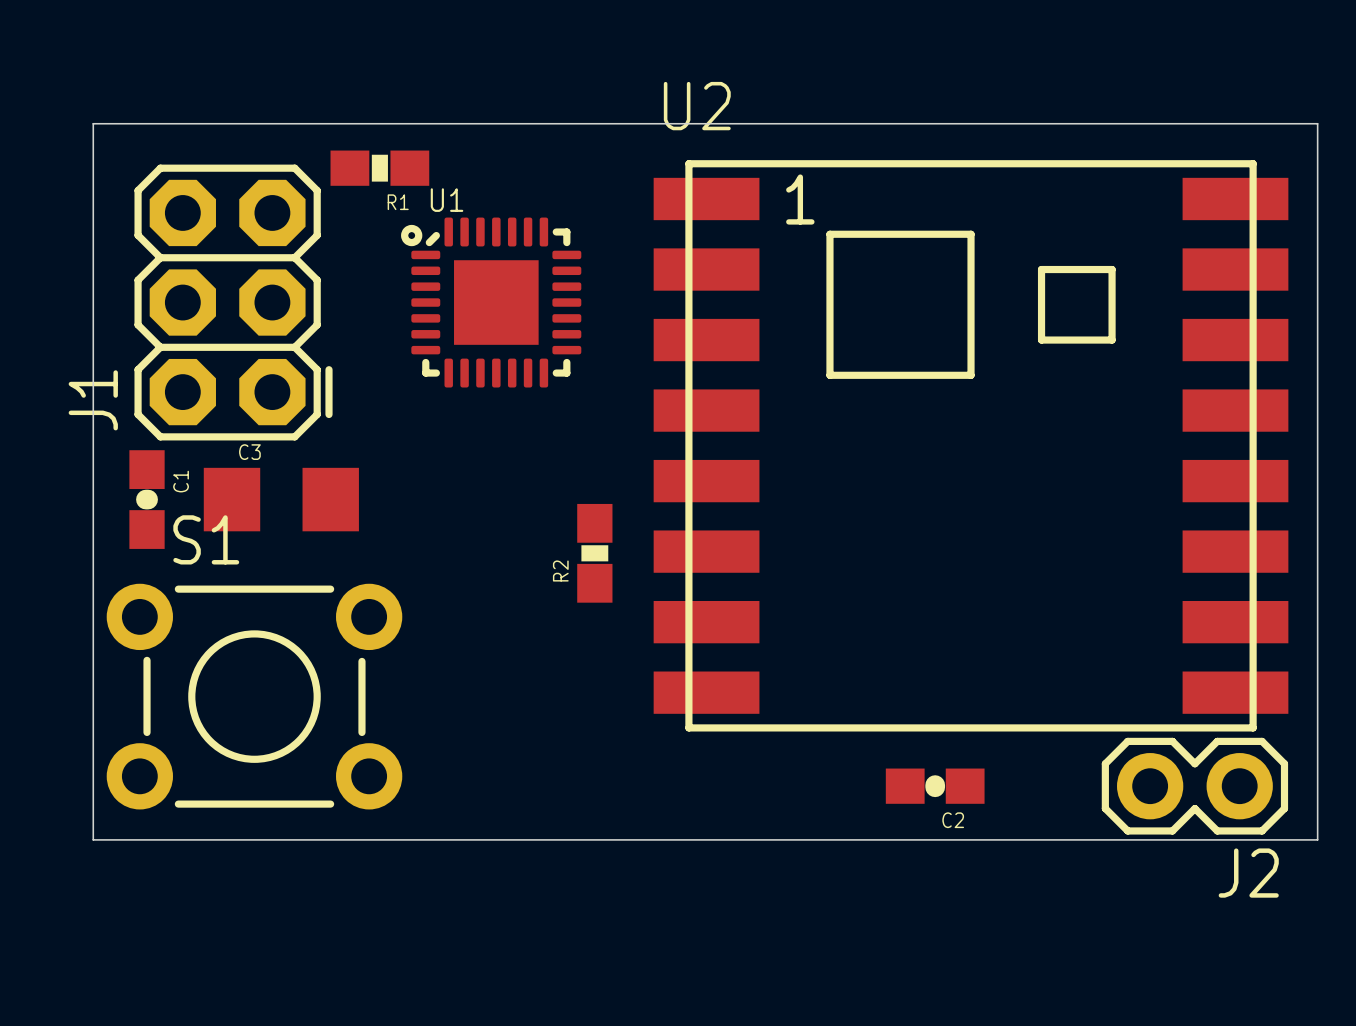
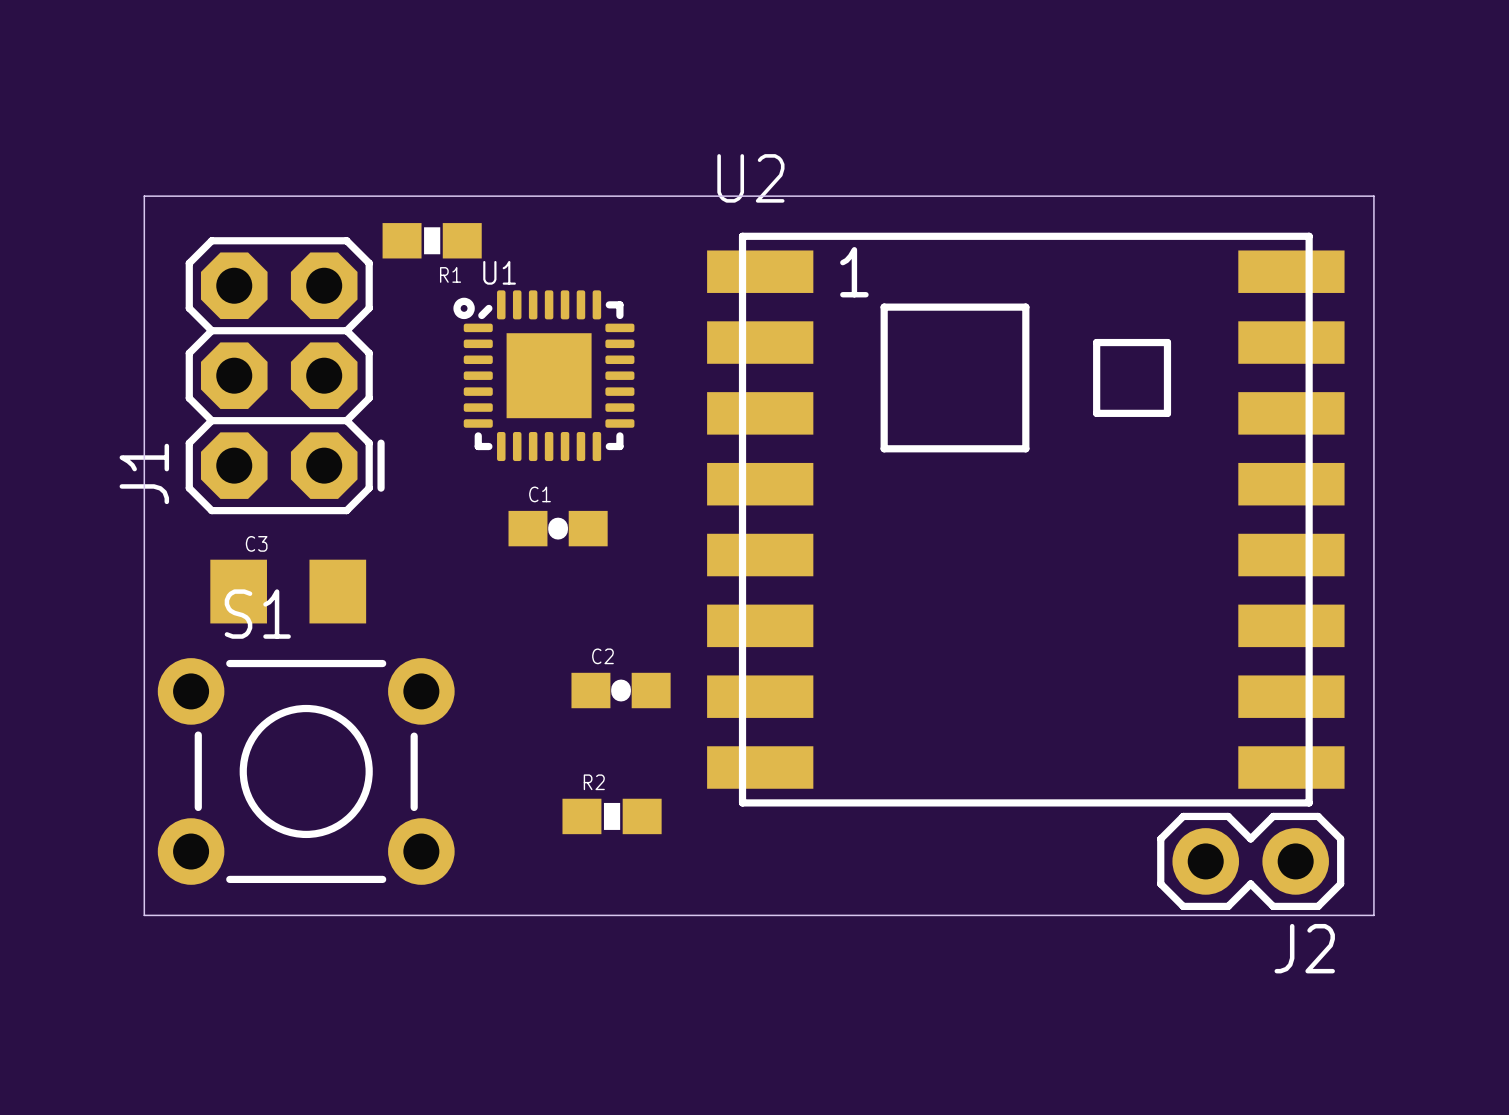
C1 rotation: 0° (147, 499) -> 90° clockwise (558, 528)
C1 position: (147, 499) -> (558, 528)
C3 position: (281, 499) -> (288, 591)
R2 rotation: 0° (594, 553) -> 90° clockwise (612, 816)
R2 position: (594, 553) -> (612, 816)
C2 position: (935, 786) -> (621, 690)
C2 name position: C2 (953, 820) -> C2 (602, 656)

